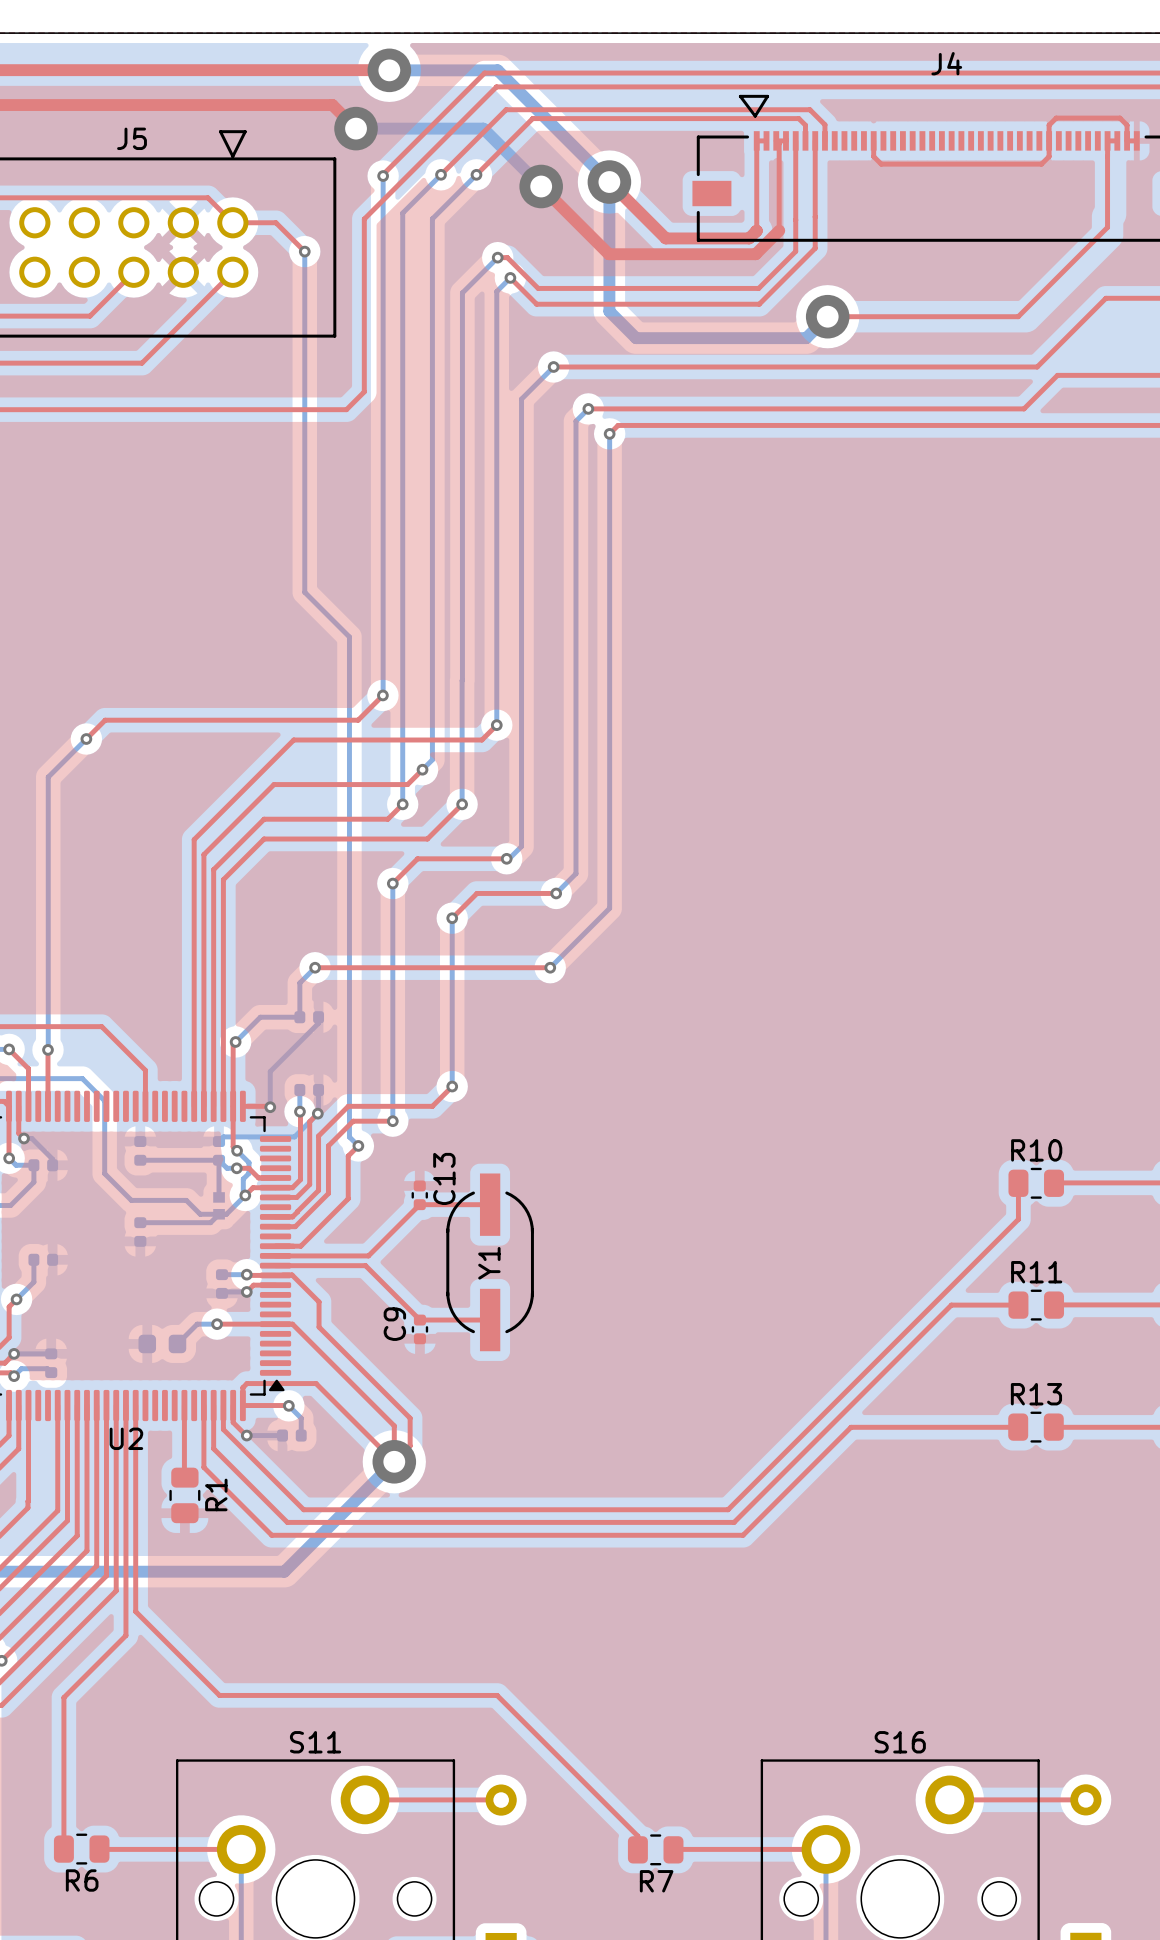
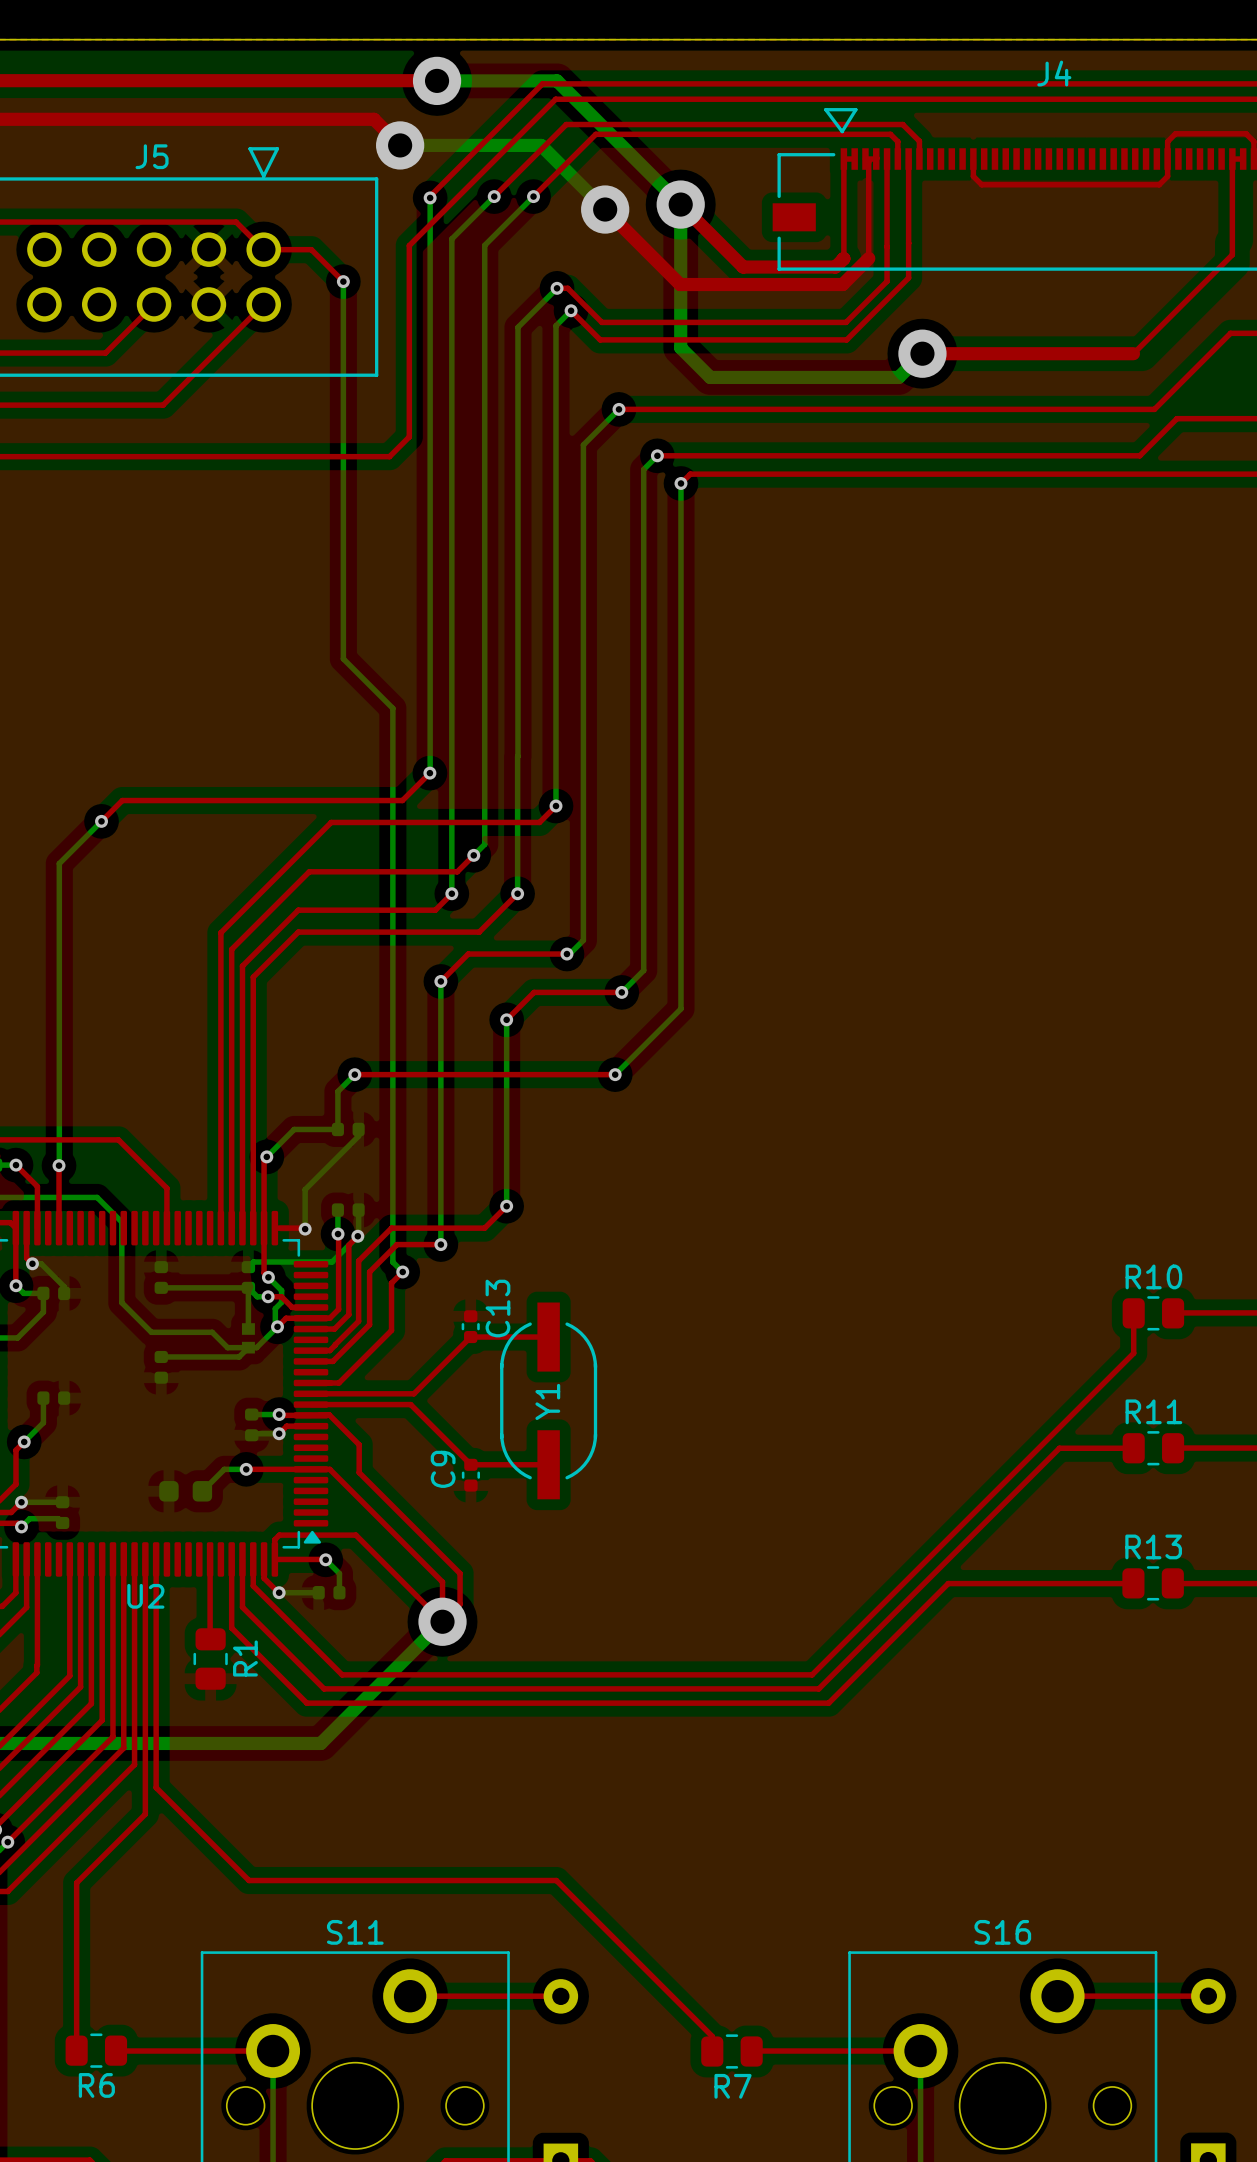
top track width: thin (827, 316) (1018, 316) -> thick (922, 353) (1133, 353)

